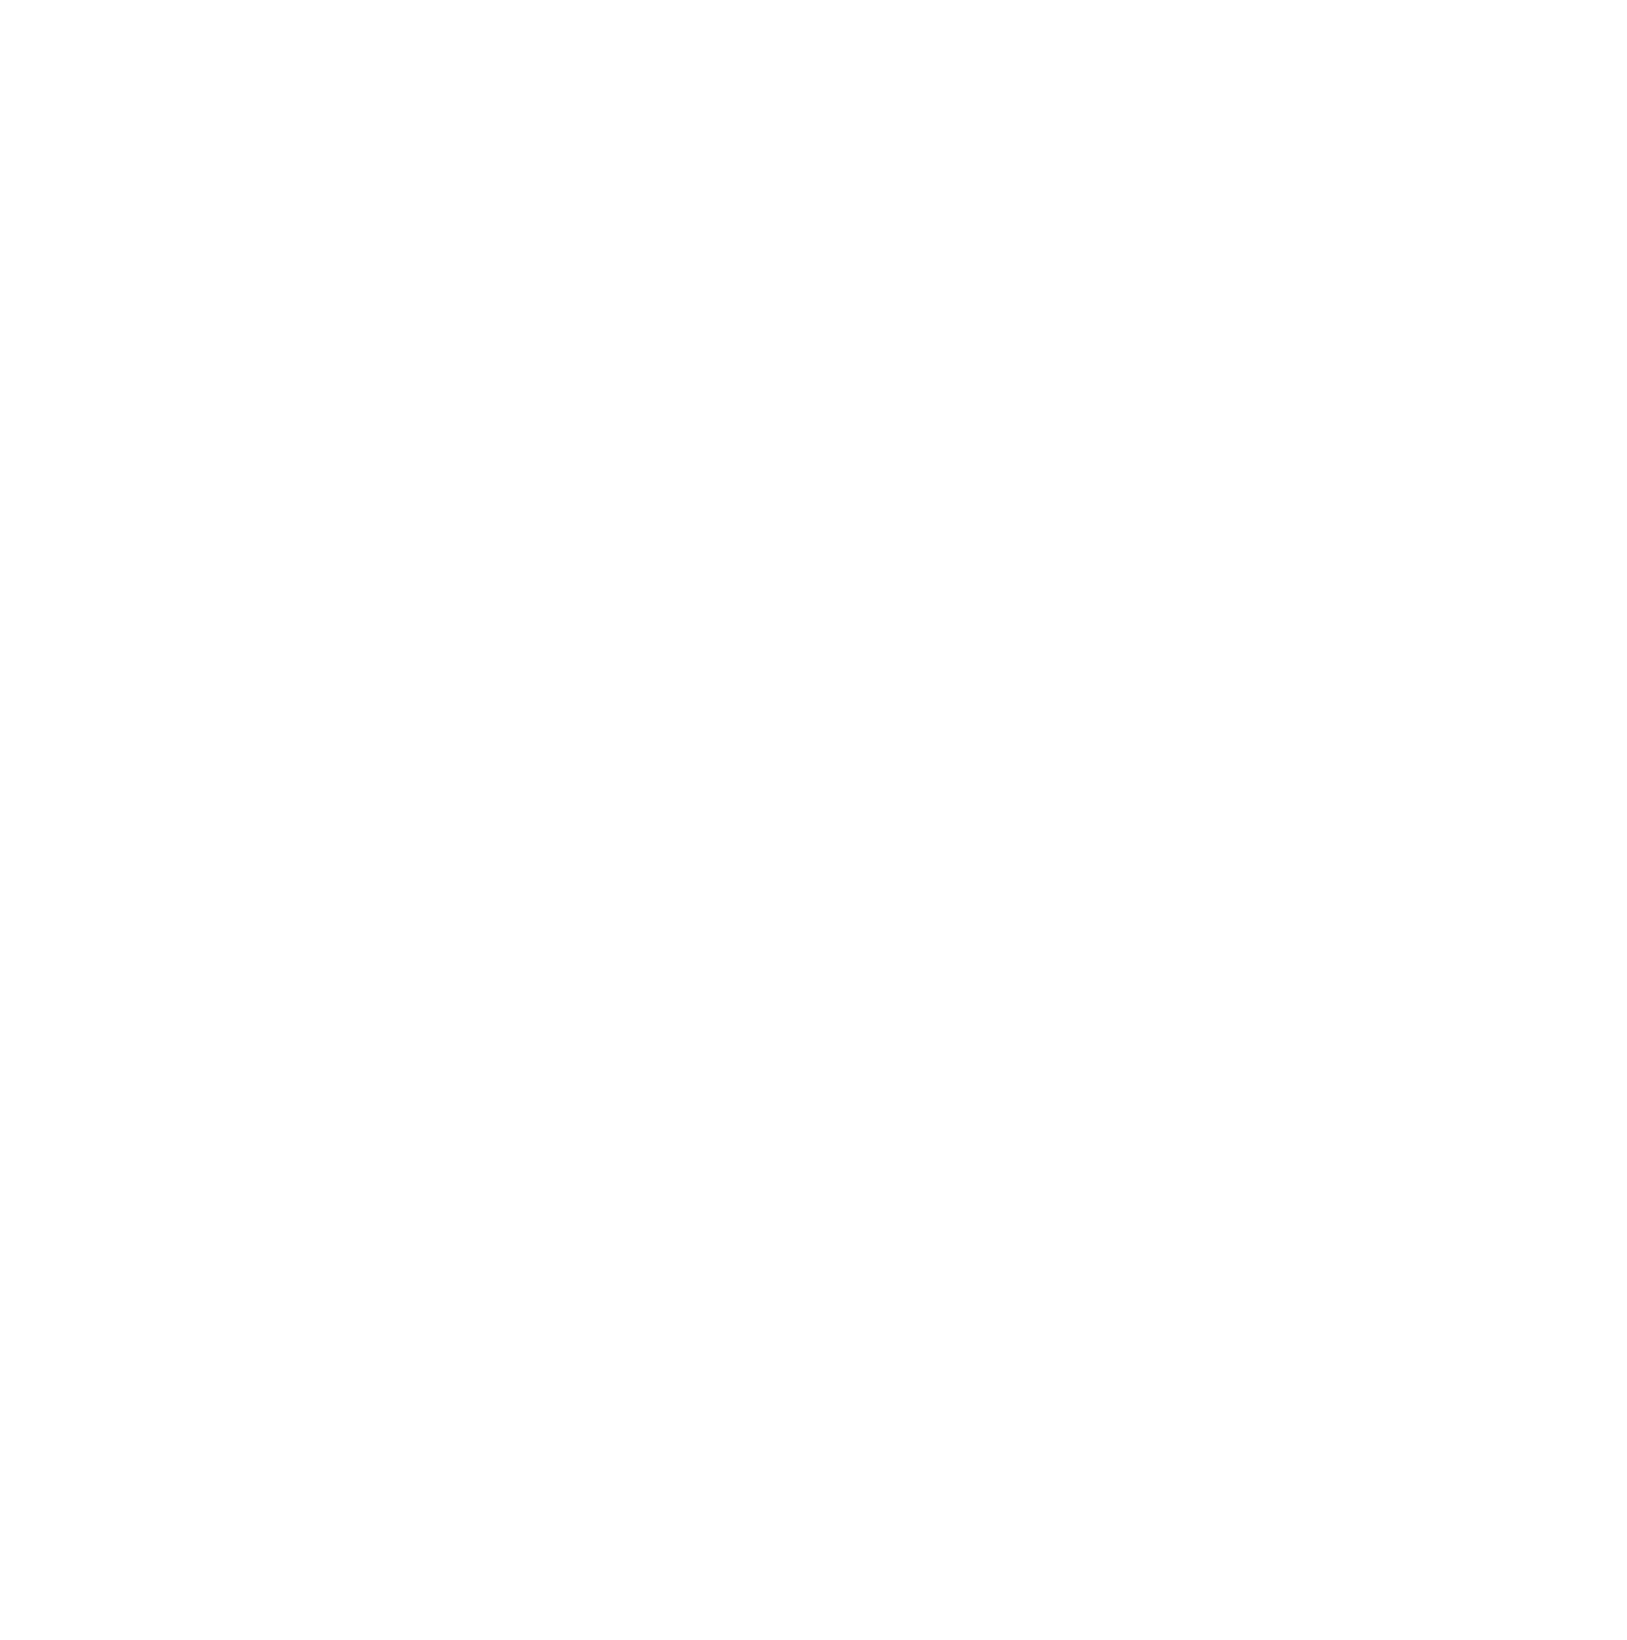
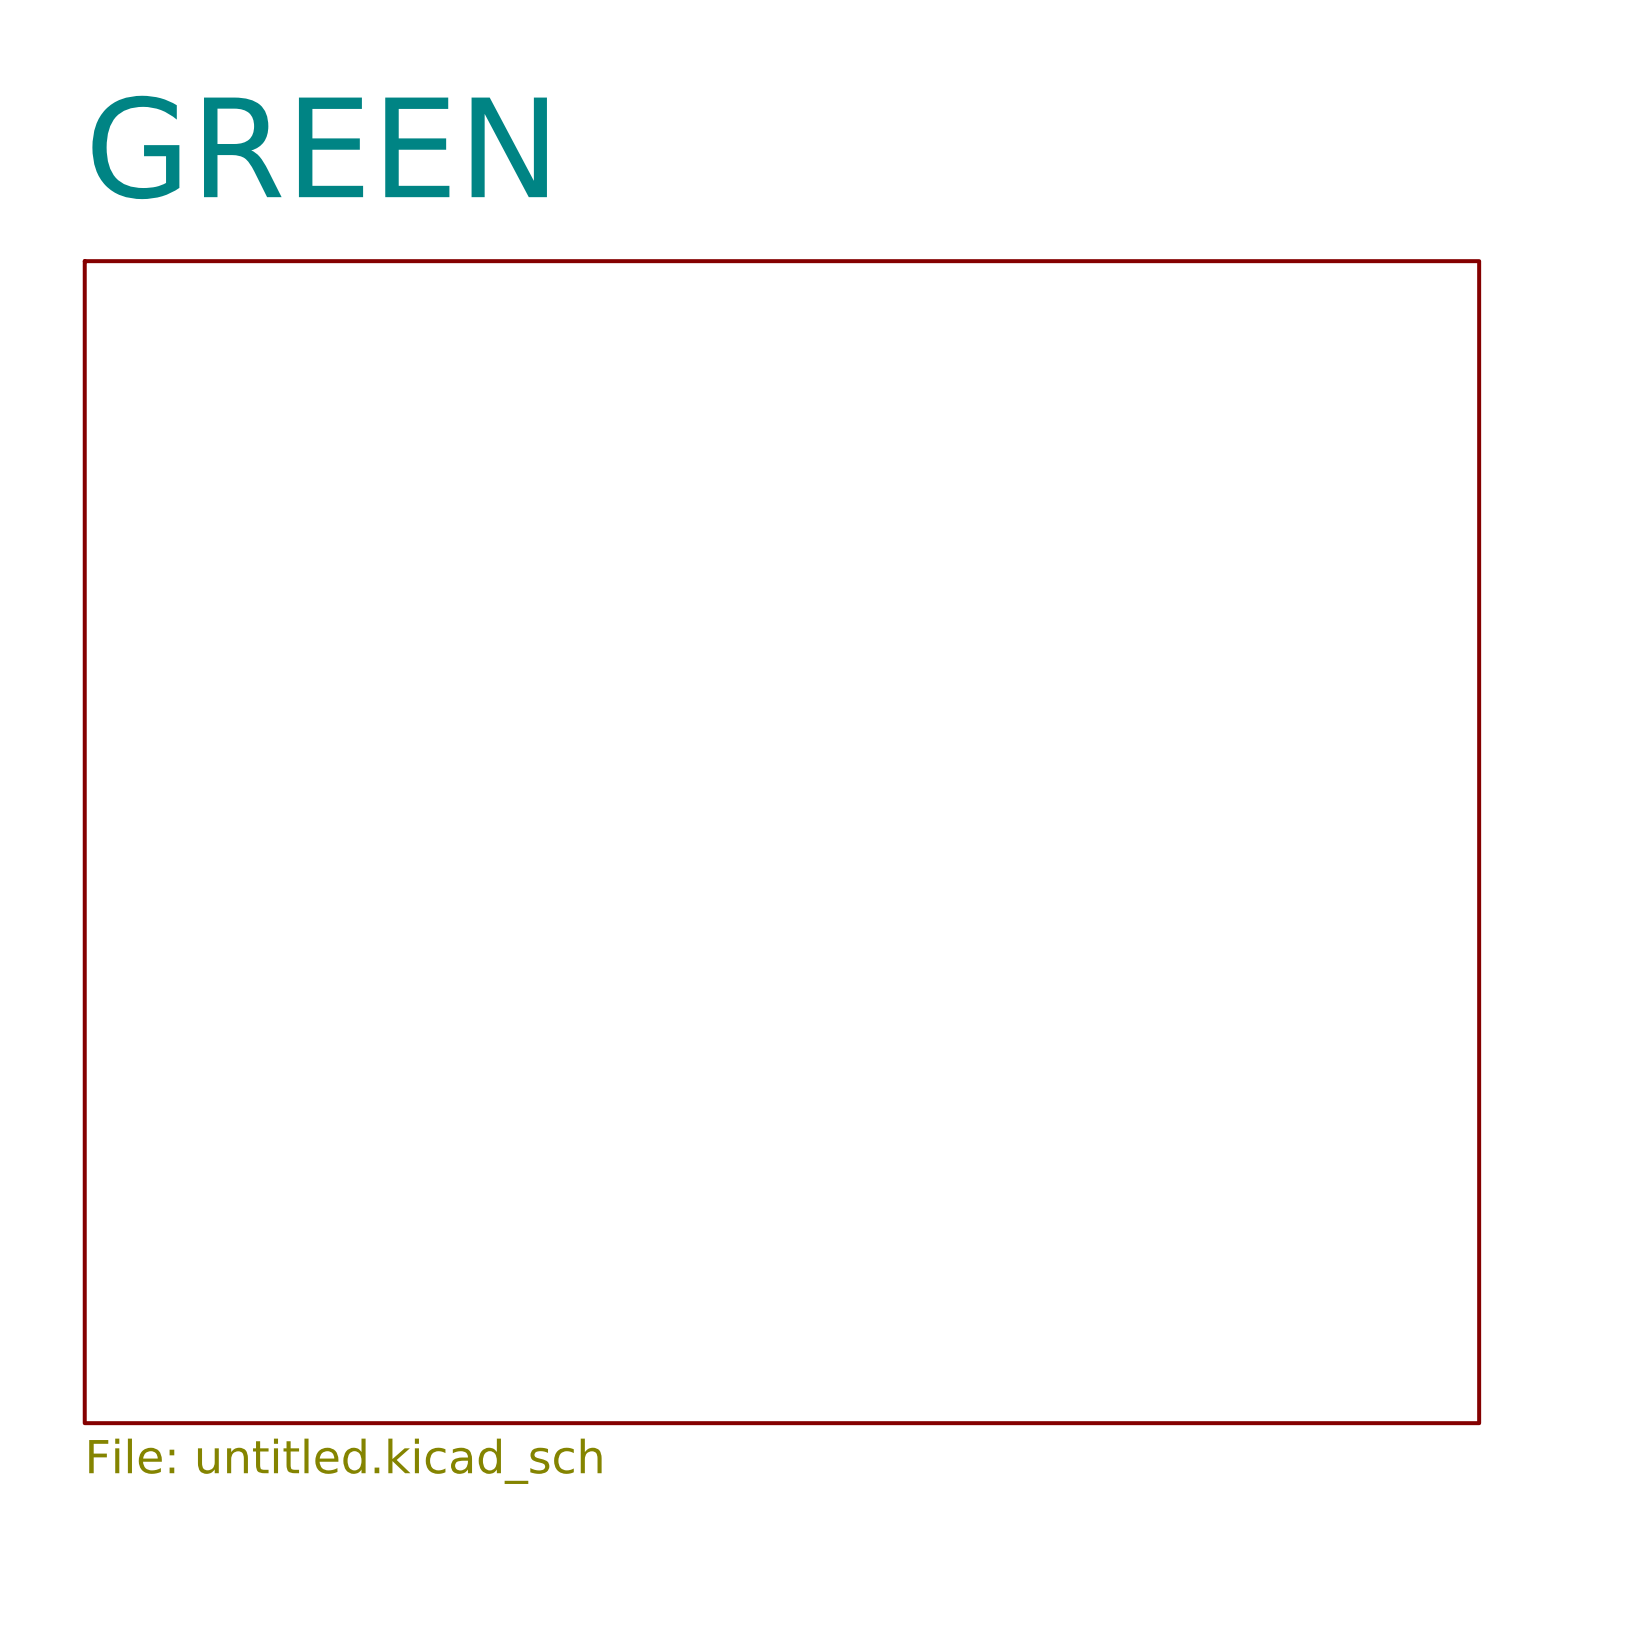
sheet GREEN: none -> File: untitled.kicad_sch (781, 842)

